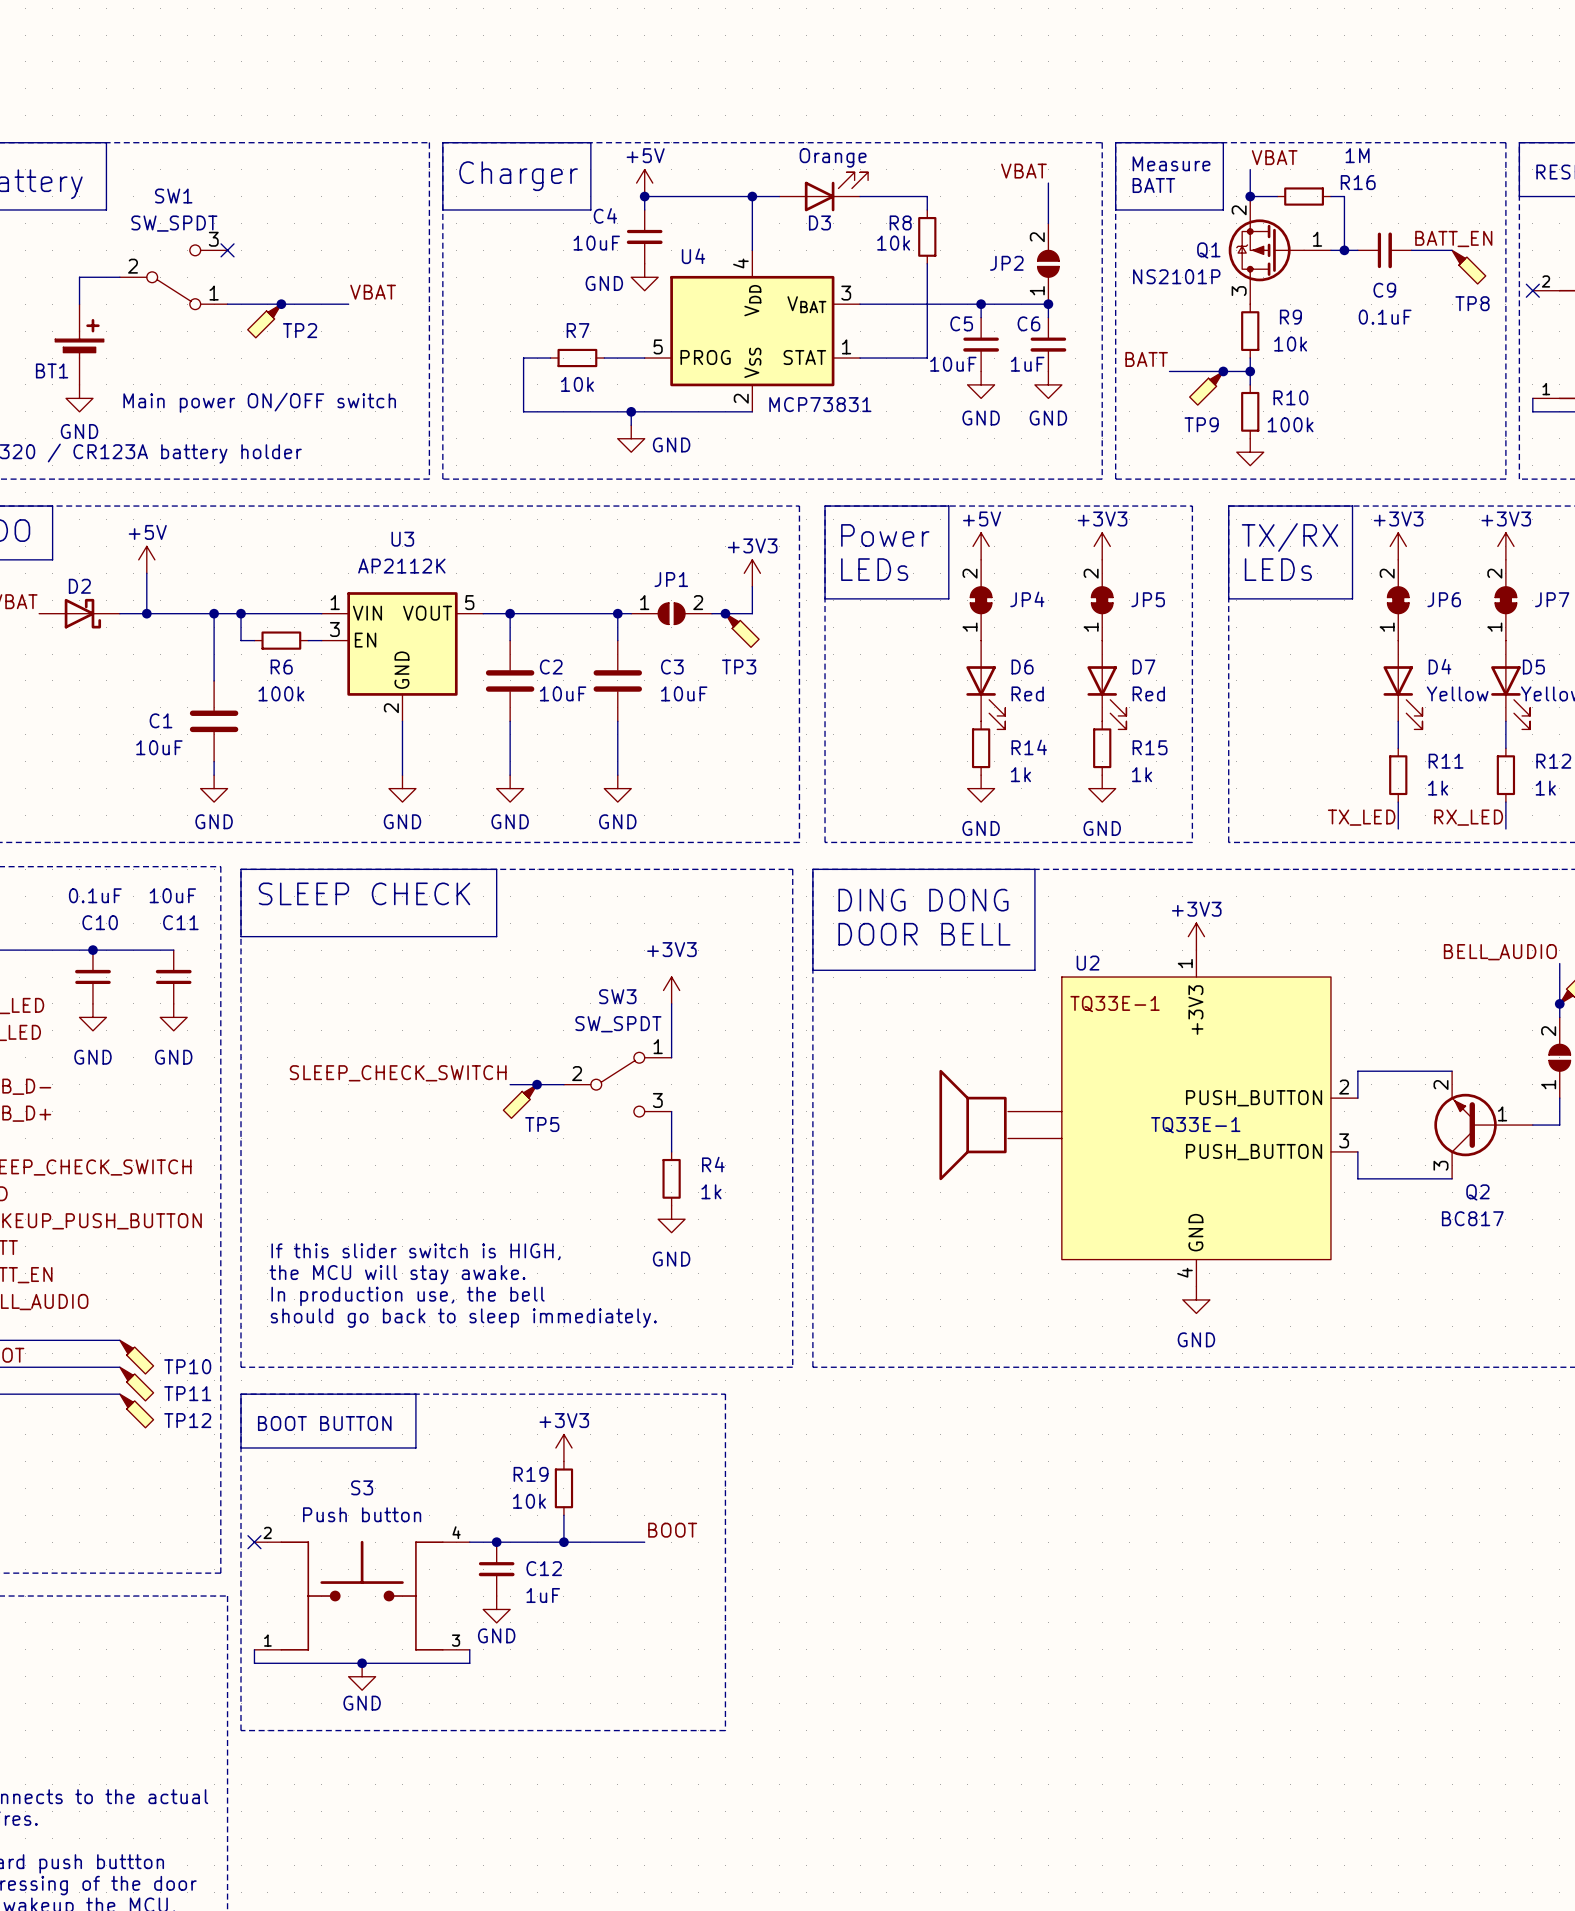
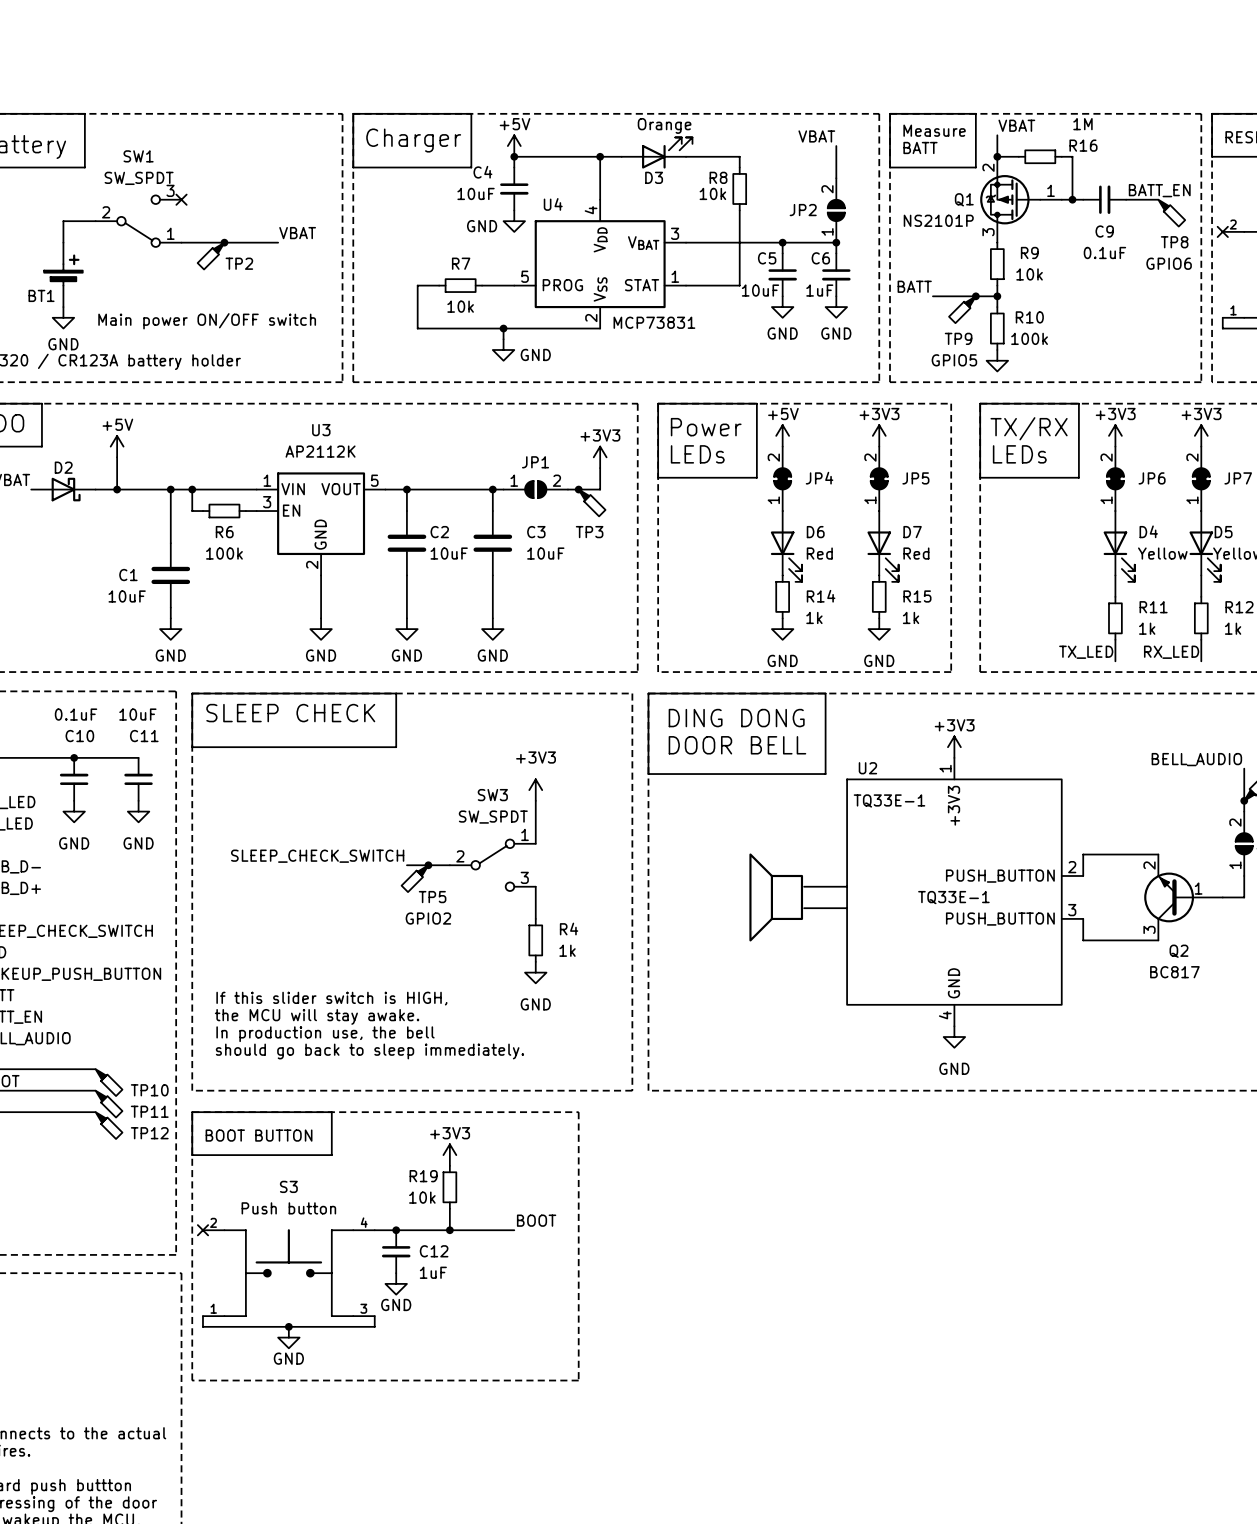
TP8 text: none -> GPIO6 (1169, 263)
TP9 text: none -> GPIO5 (954, 360)
TP5 text: none -> GPIO2 (428, 918)

